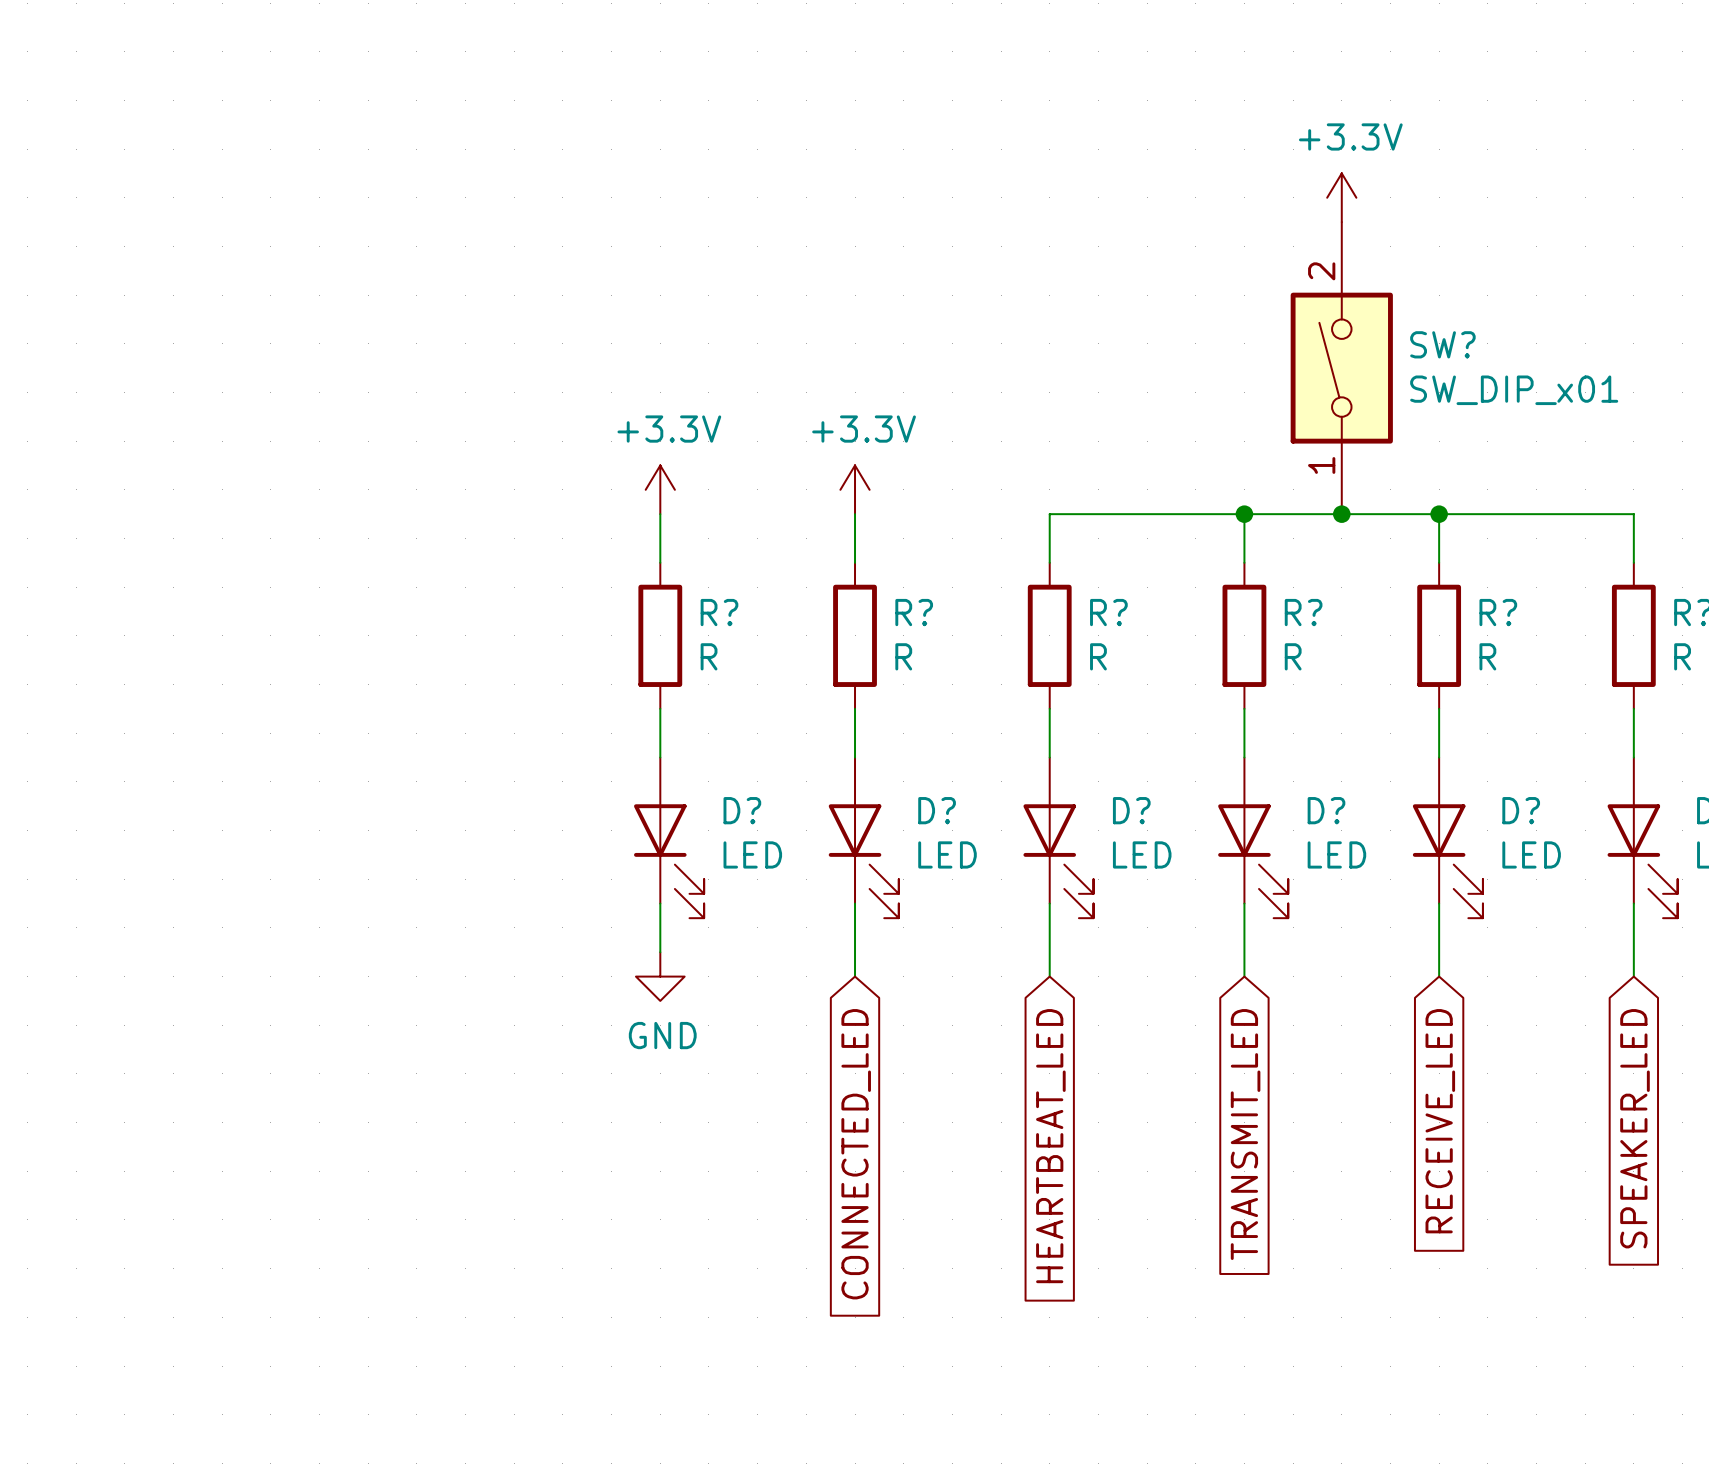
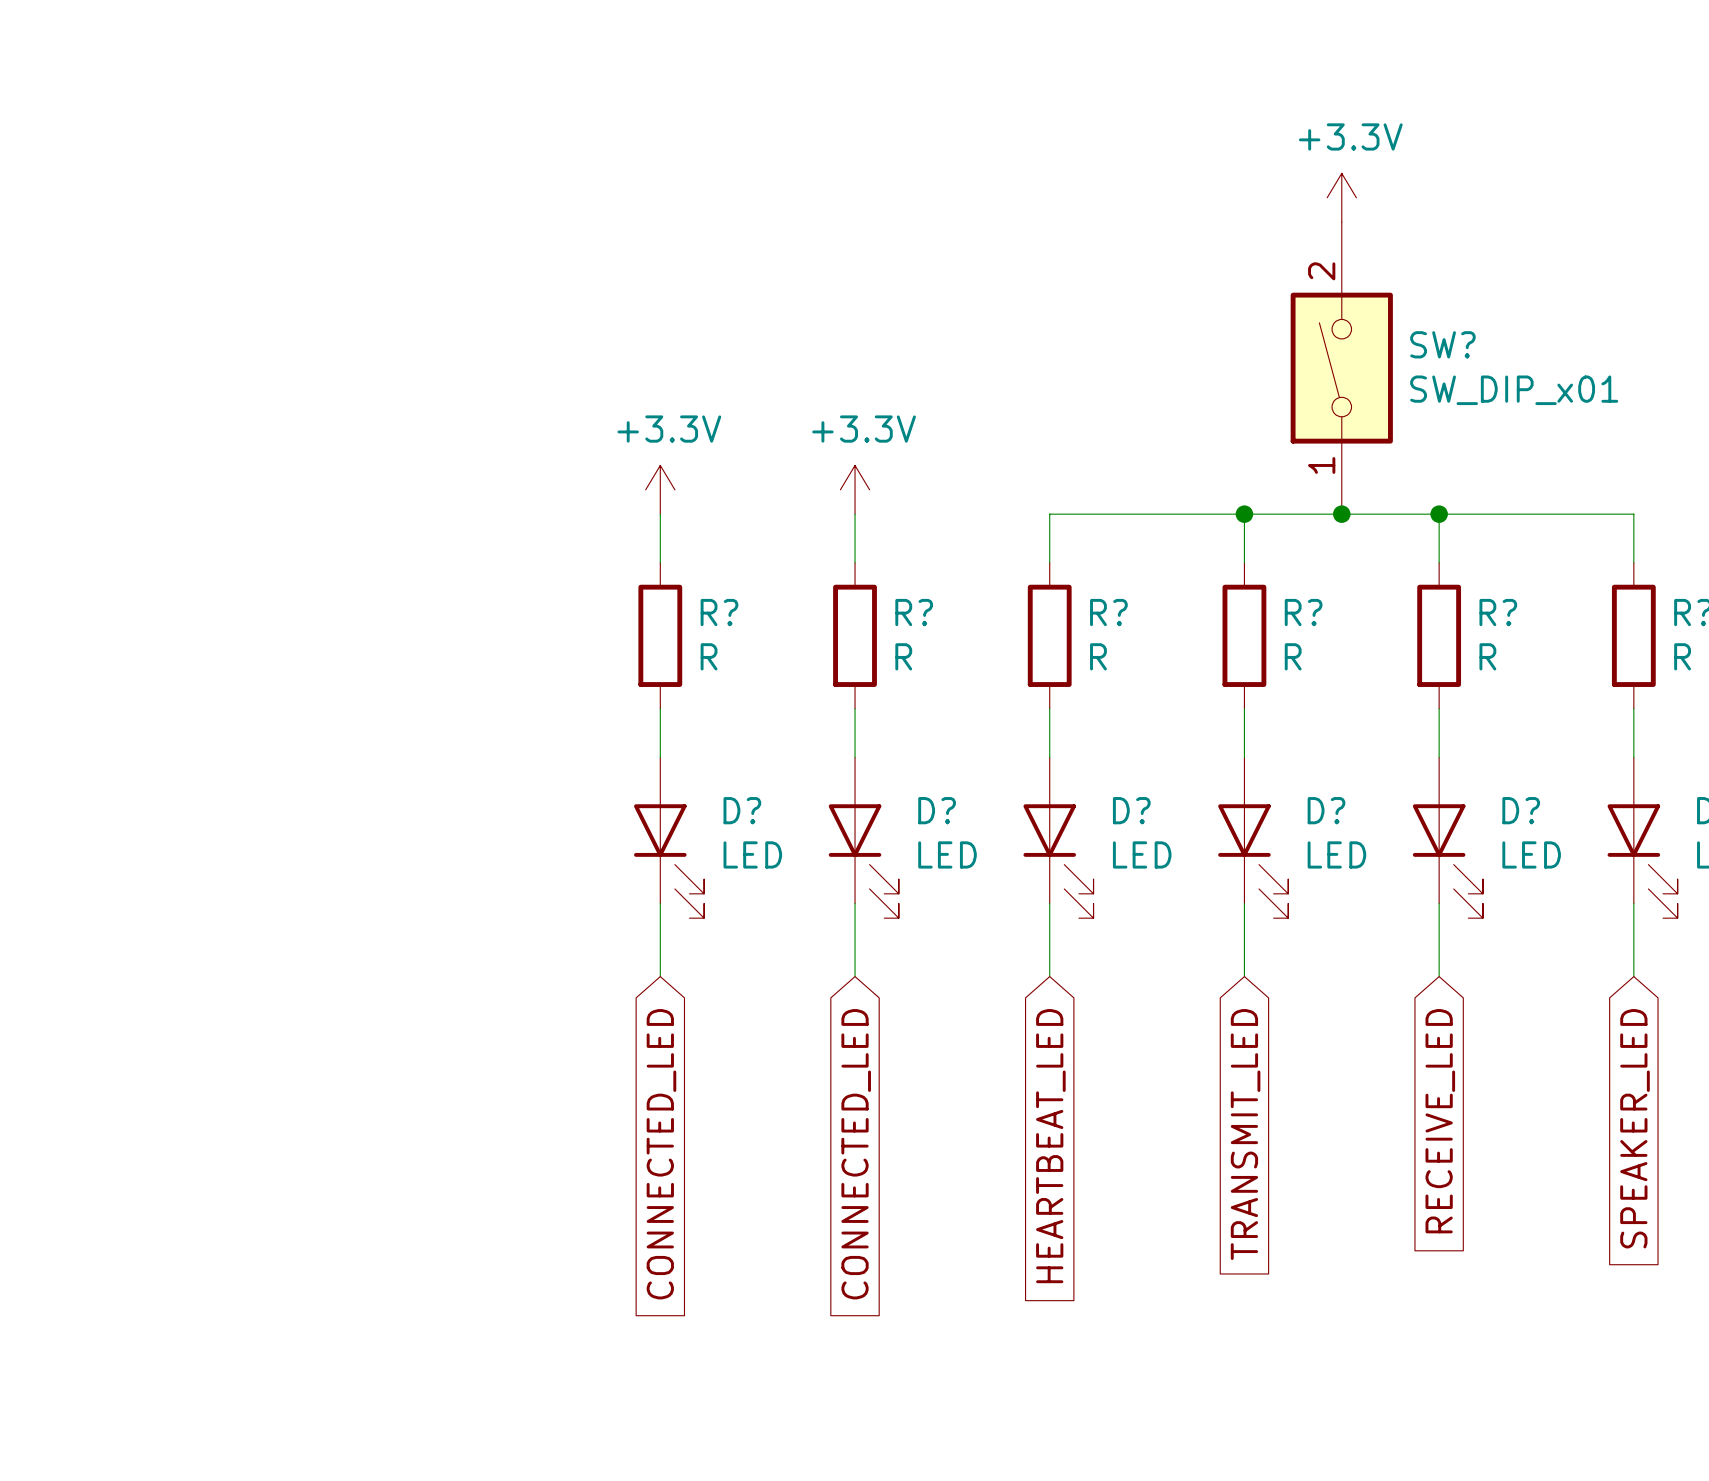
power symbol: GND (660, 976) -> none
global label: none -> CONNECTED_LED (661, 1154)

